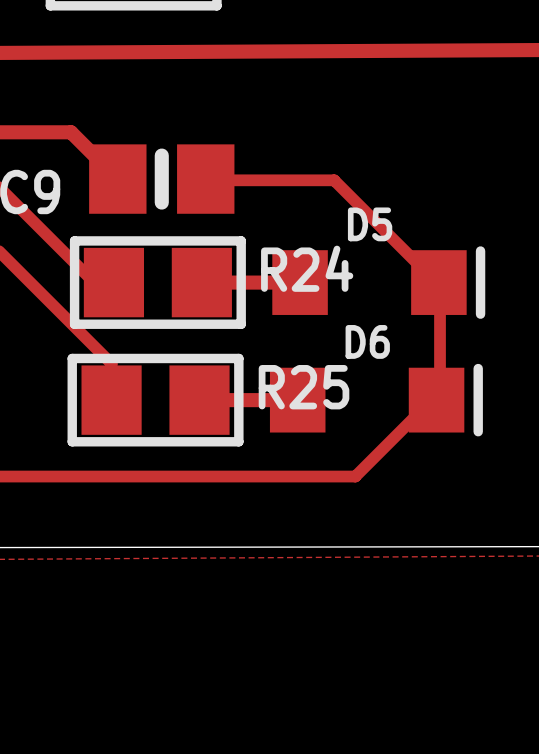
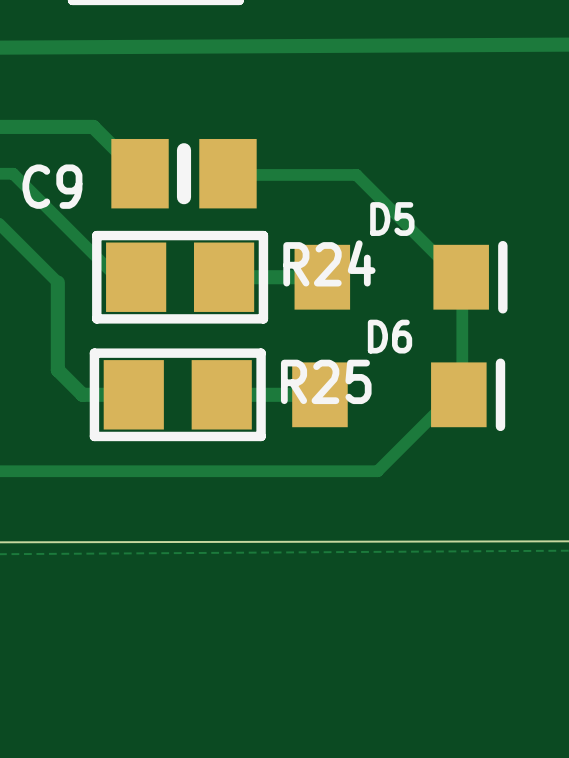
track: (35, 287) (111, 363) (111, 400) -> (57, 282) (57, 370) (82, 394) (133, 394)

